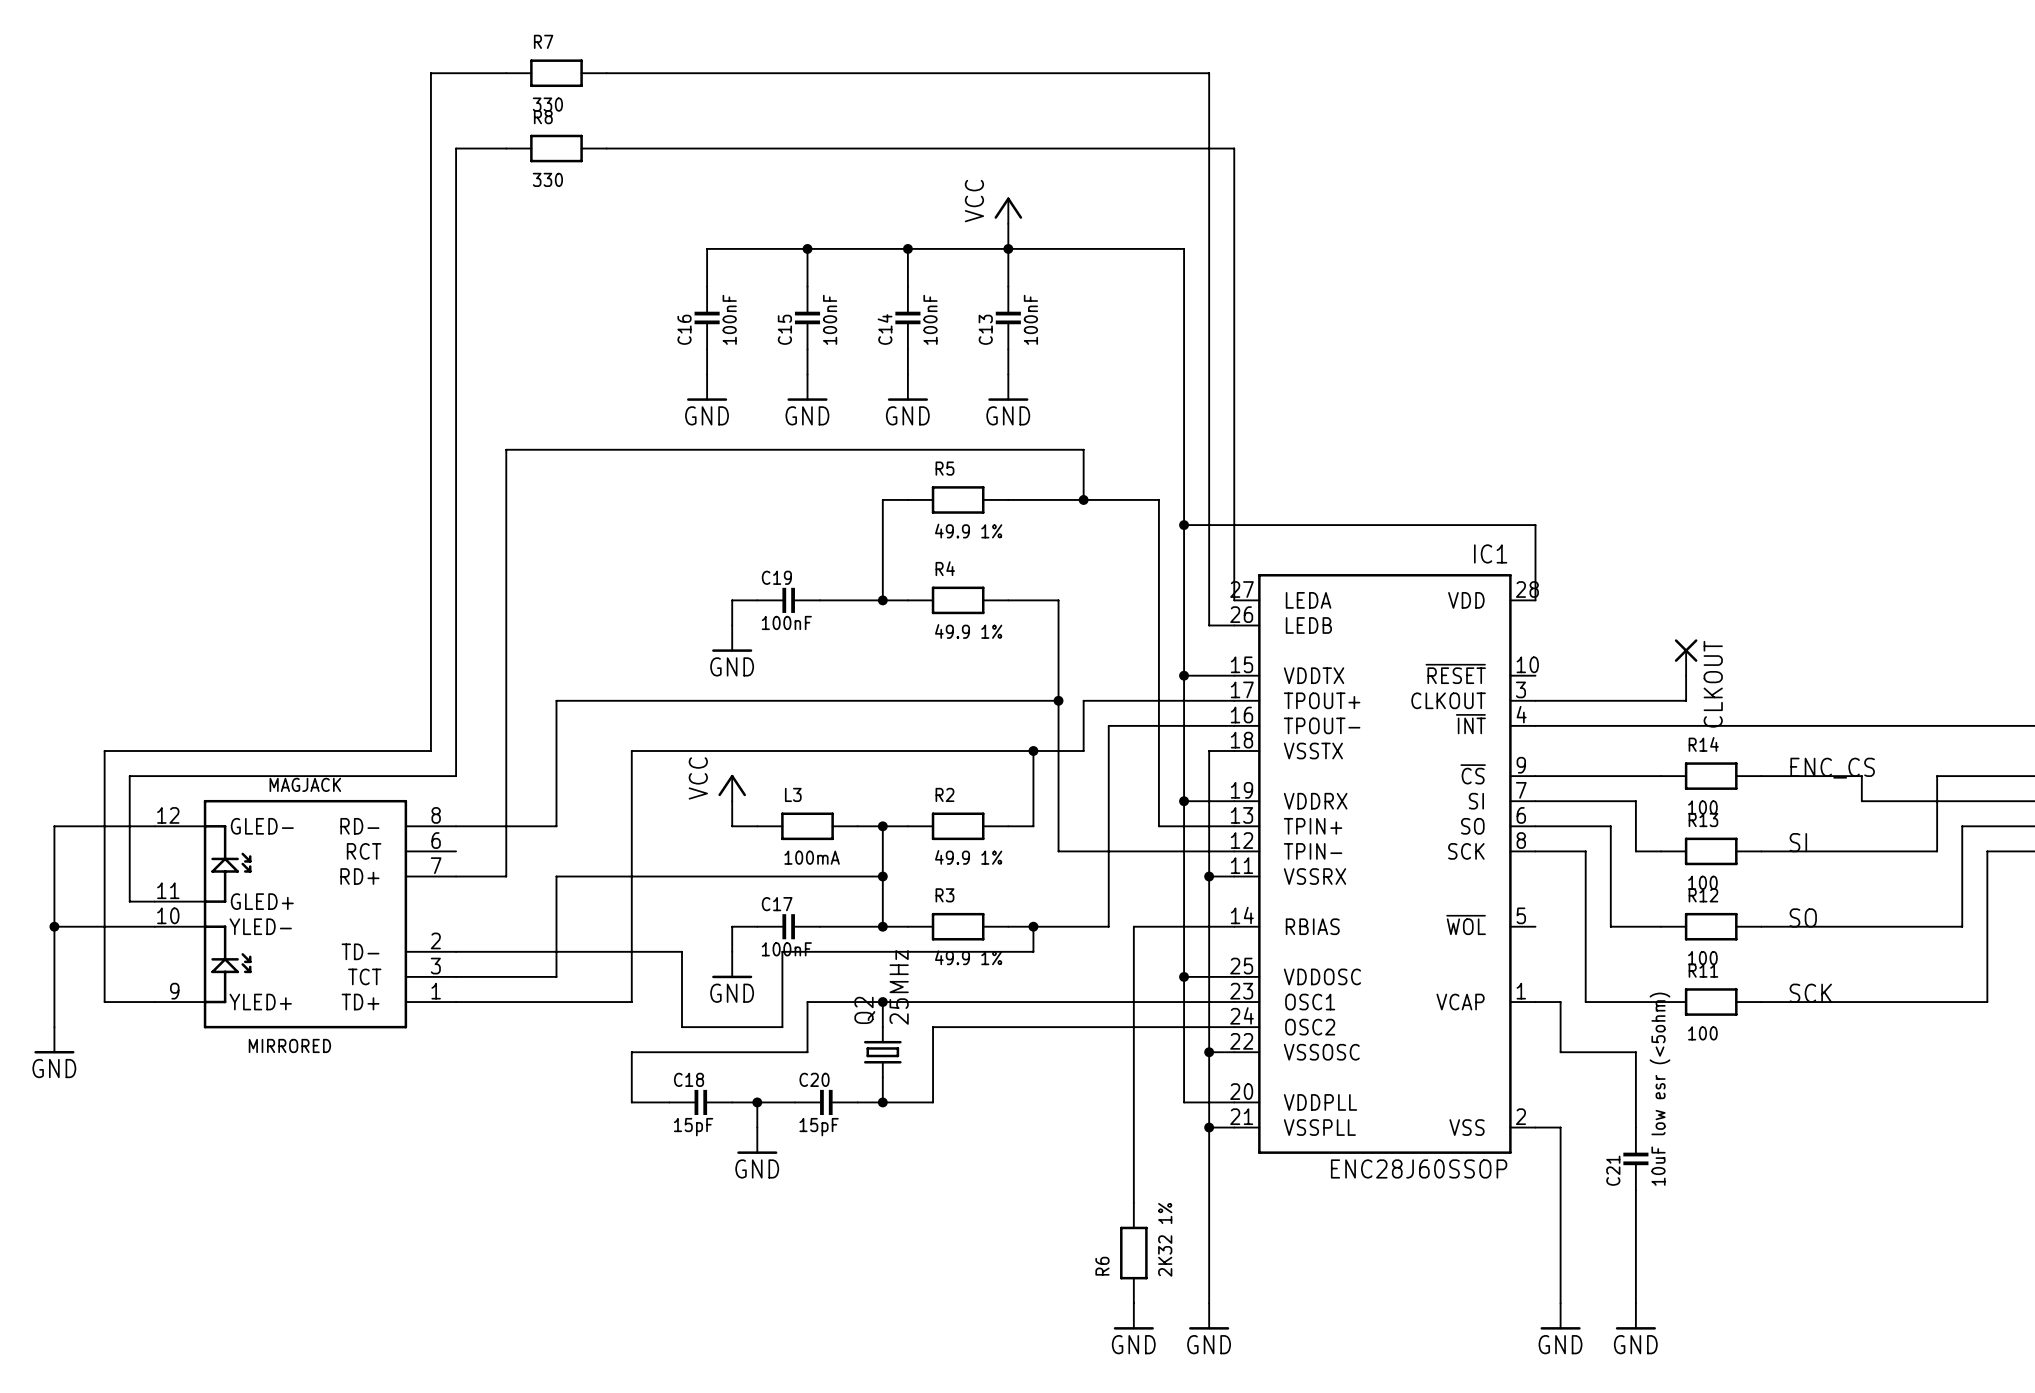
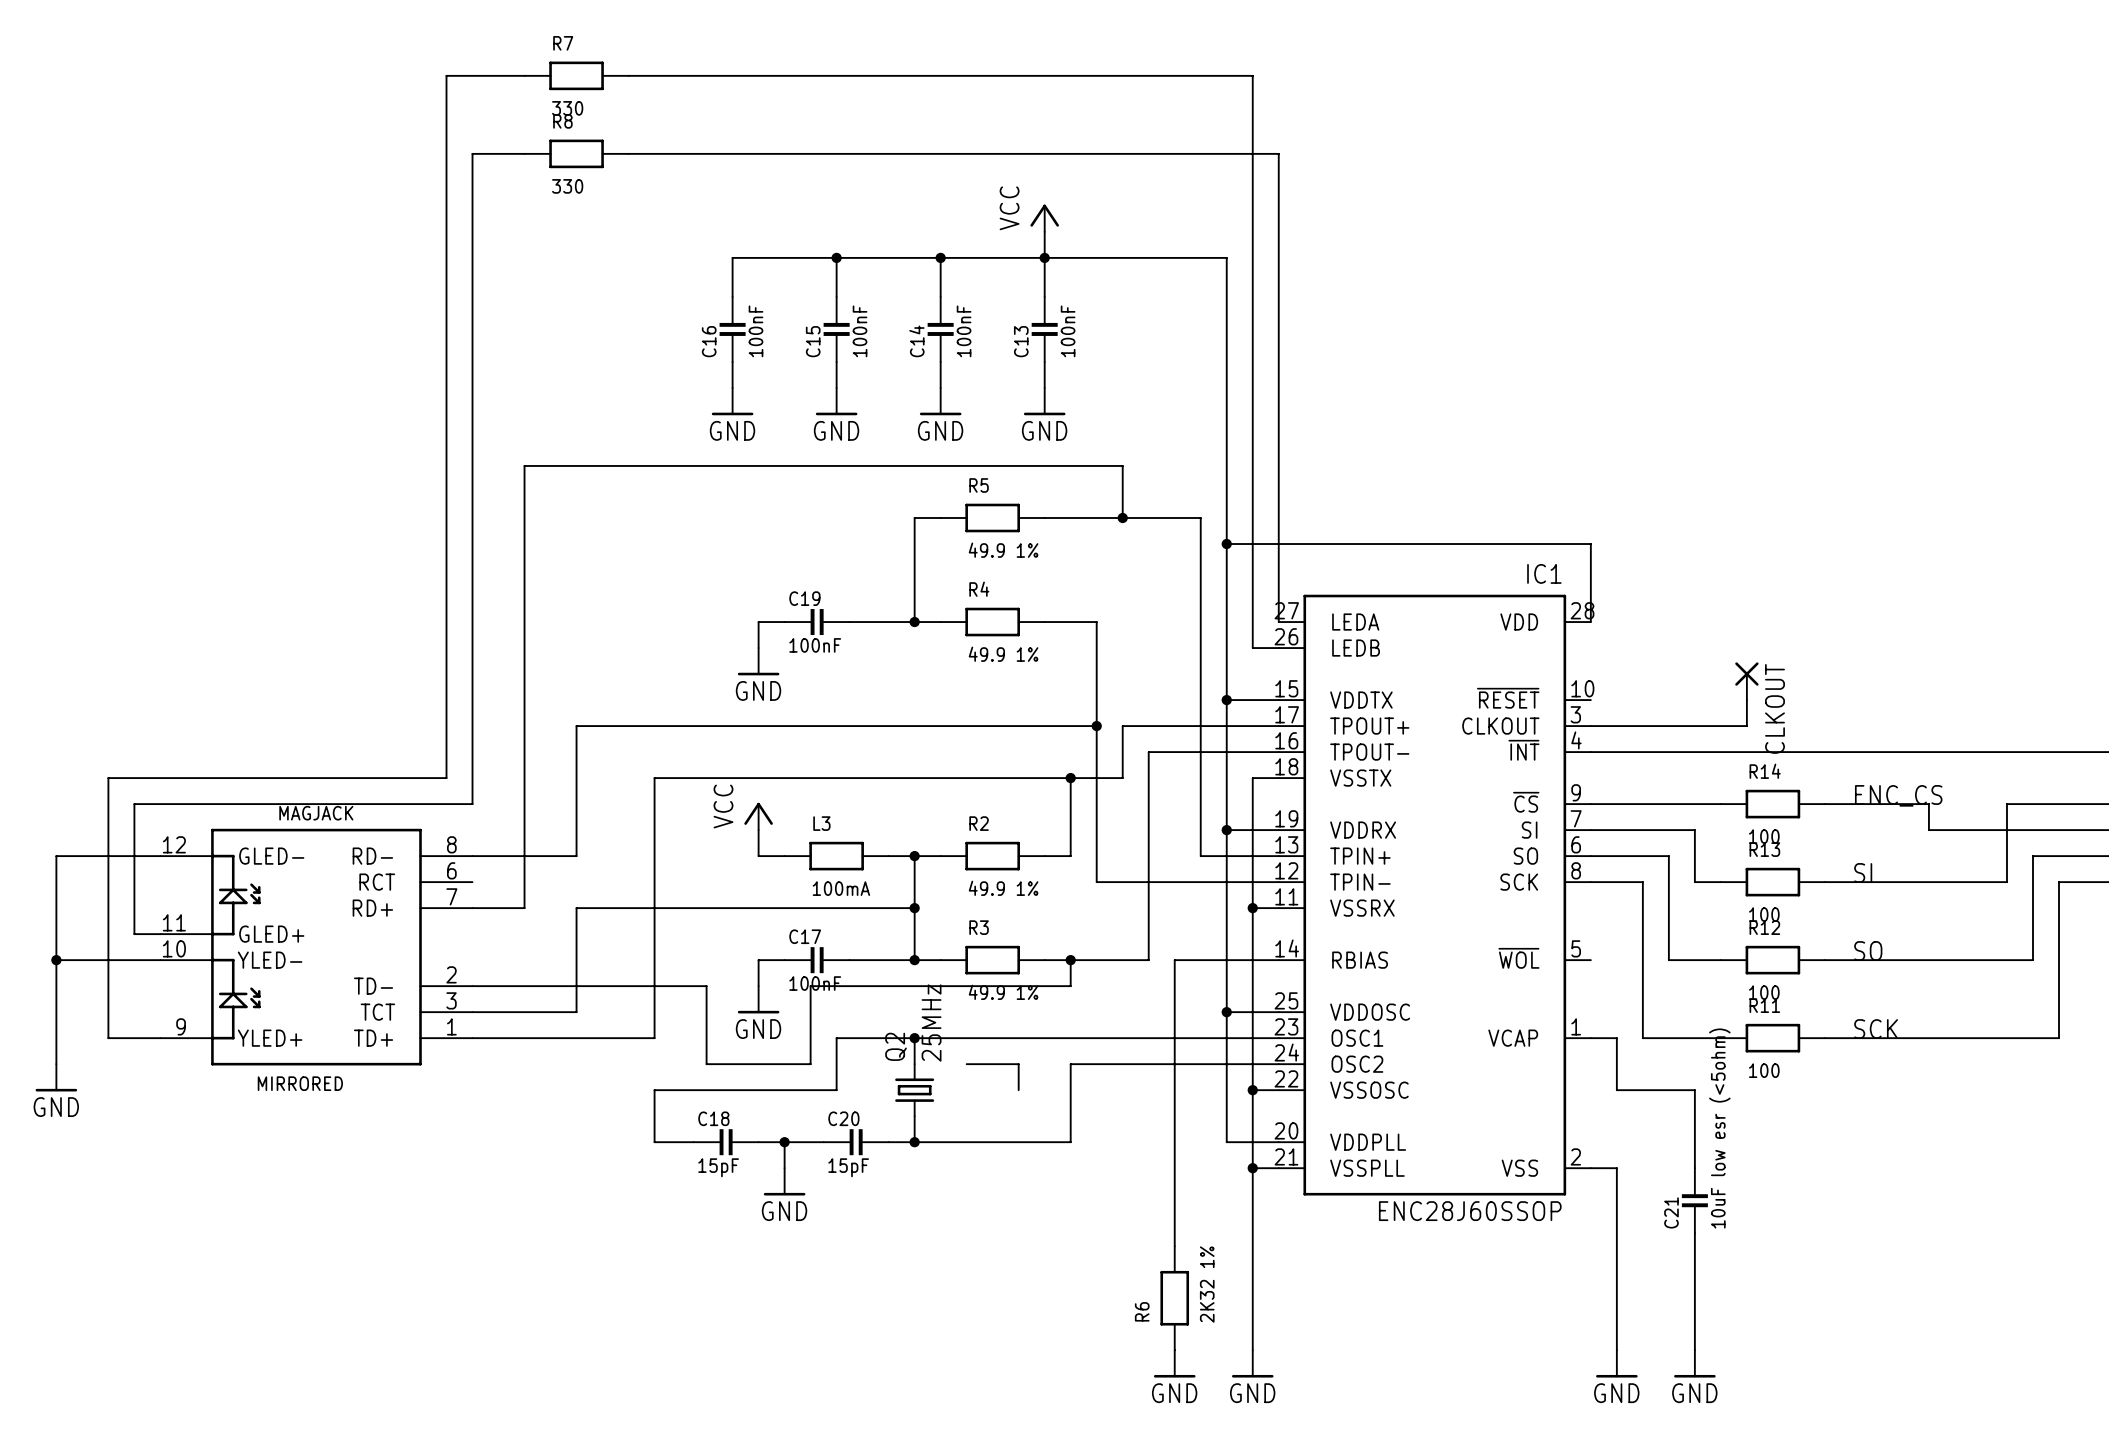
wire: (933, 1027) (933, 1102) -> (1070, 1064) (1070, 1142) (966, 1142)
wire: (983, 1027) (1033, 1027) -> (1018, 1064) (1018, 1090)

